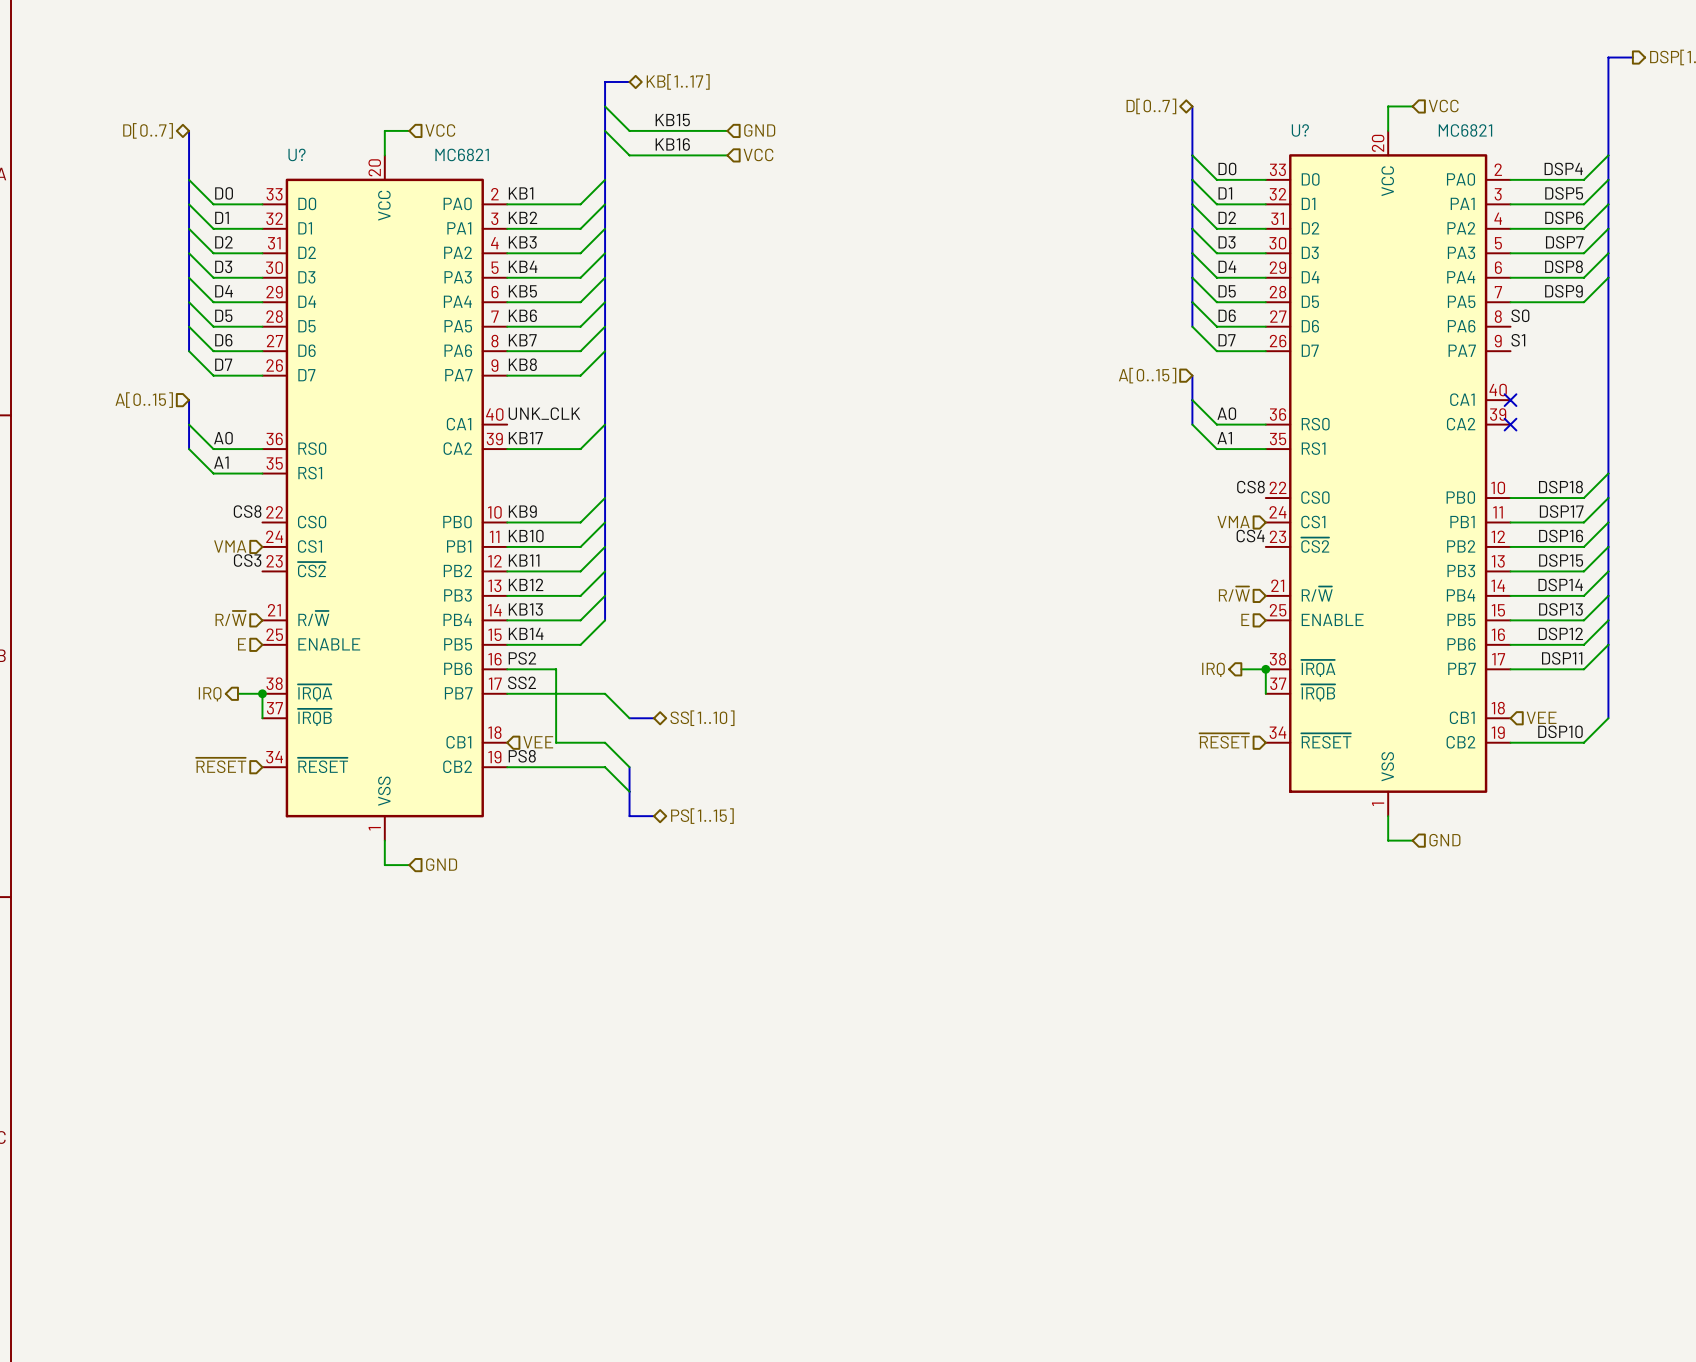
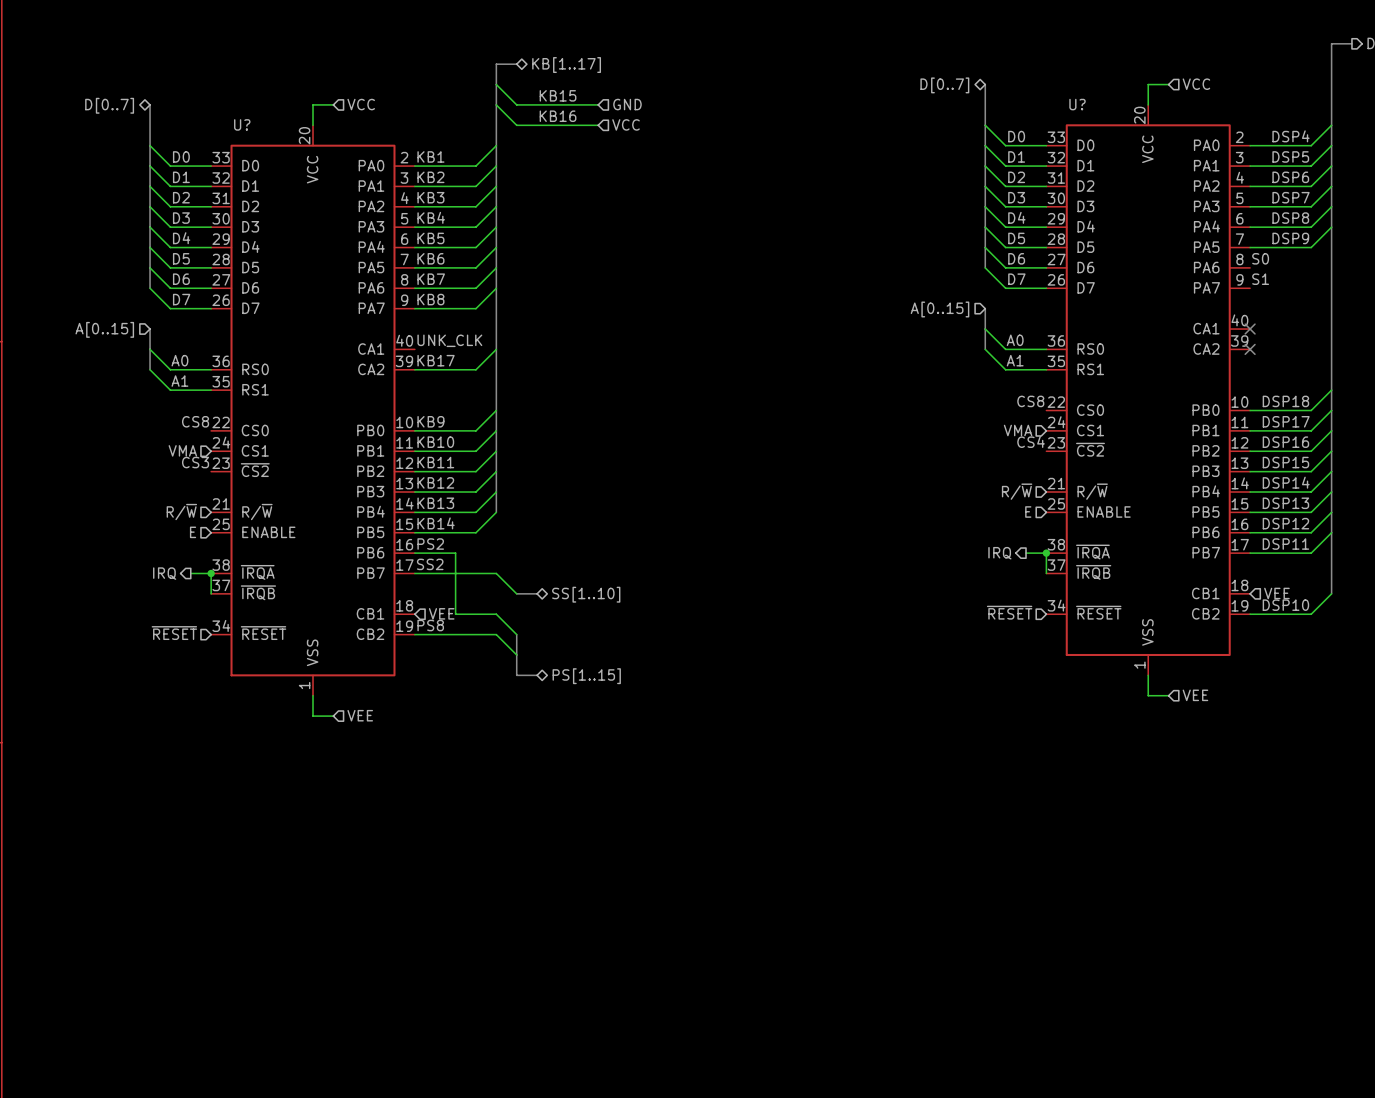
U? value: MC6821 (1465, 130) -> none
U? value: MC6821 (462, 154) -> none
hierarchical label: GND (1444, 840) -> VEE (1195, 695)
hierarchical label: GND (441, 864) -> VEE (360, 715)

